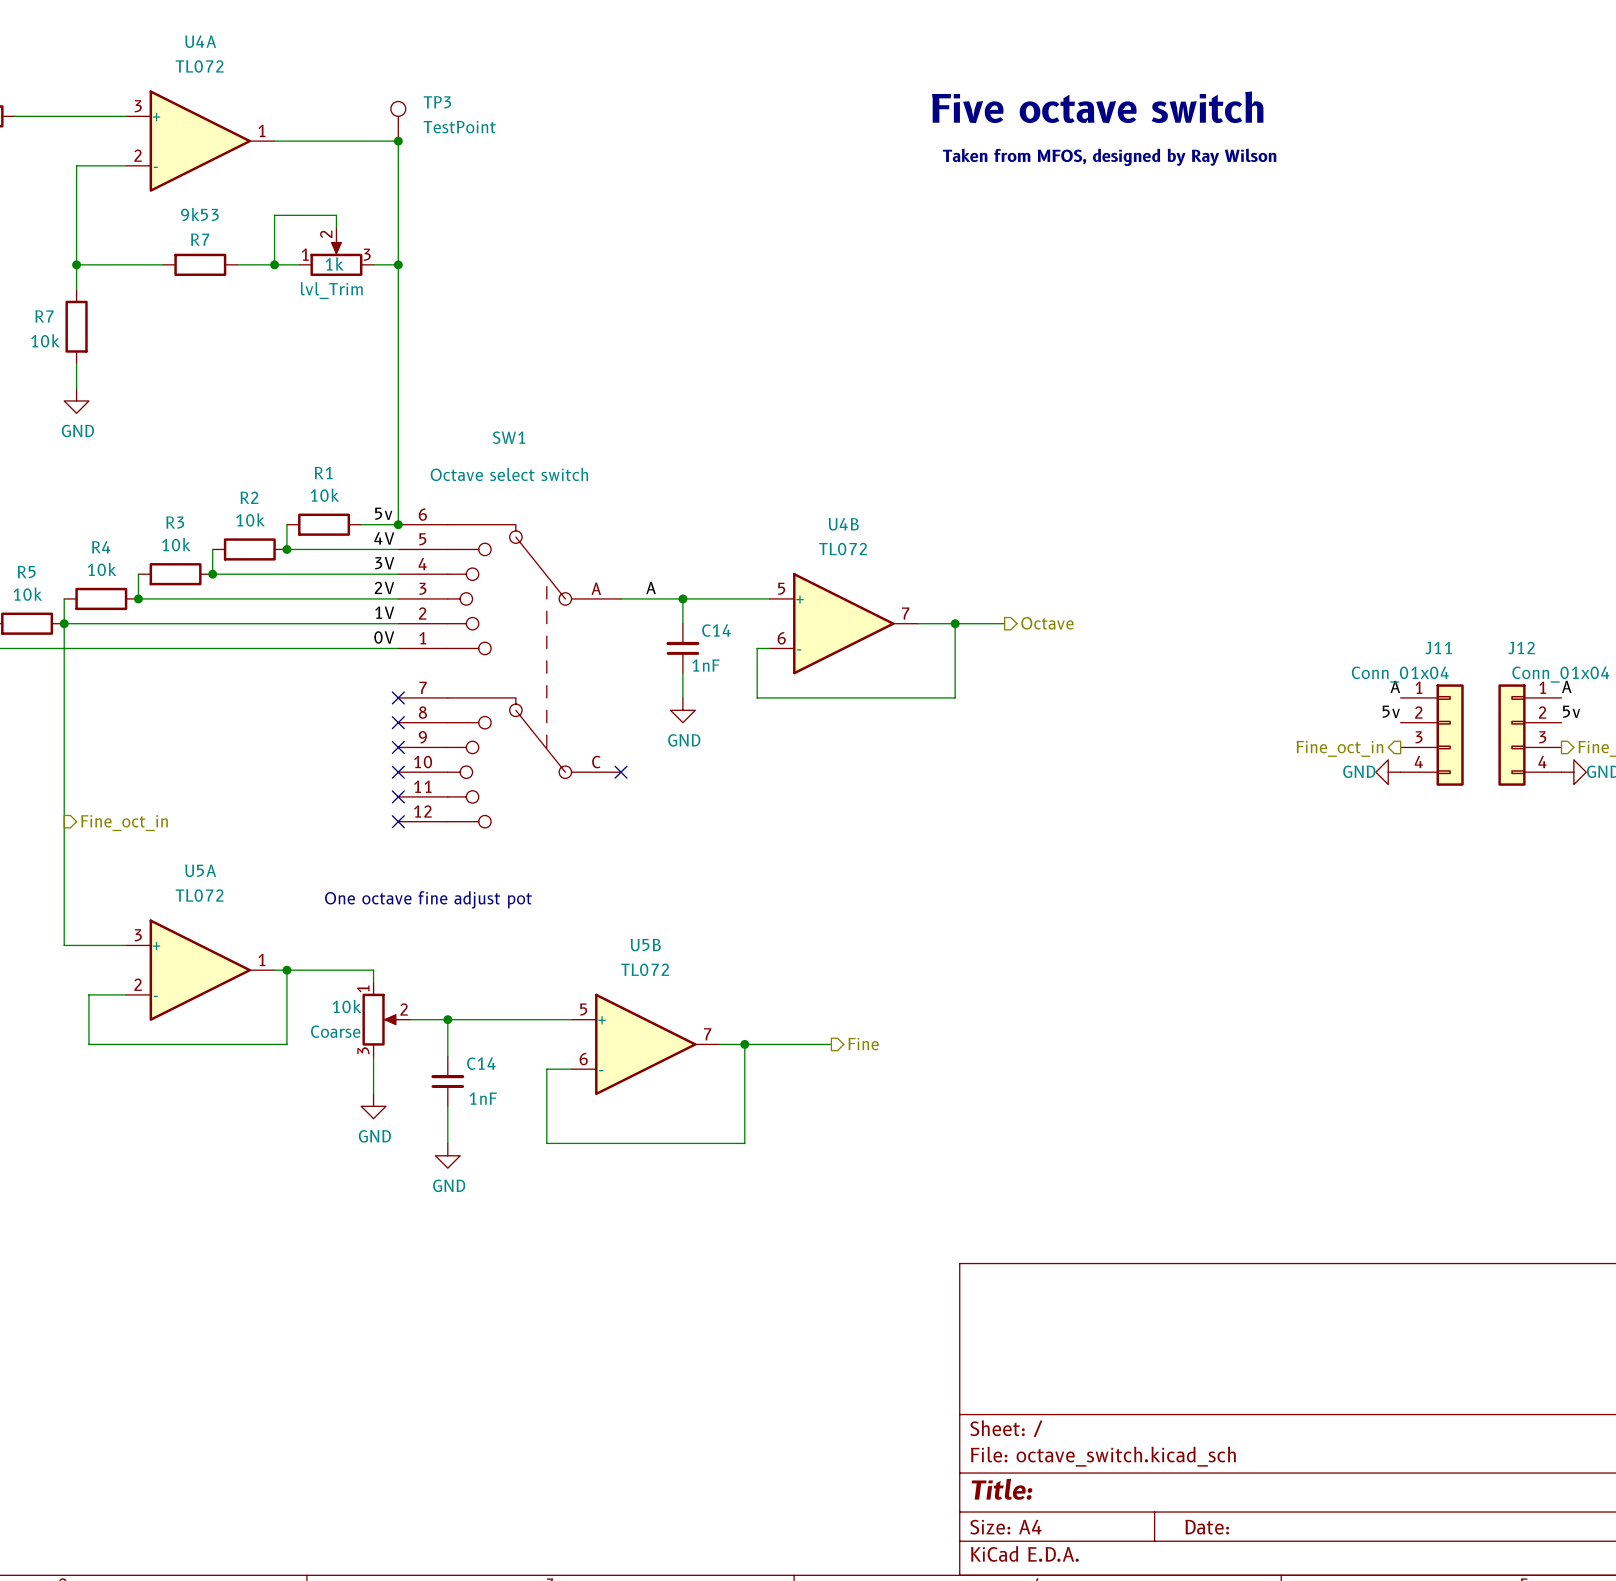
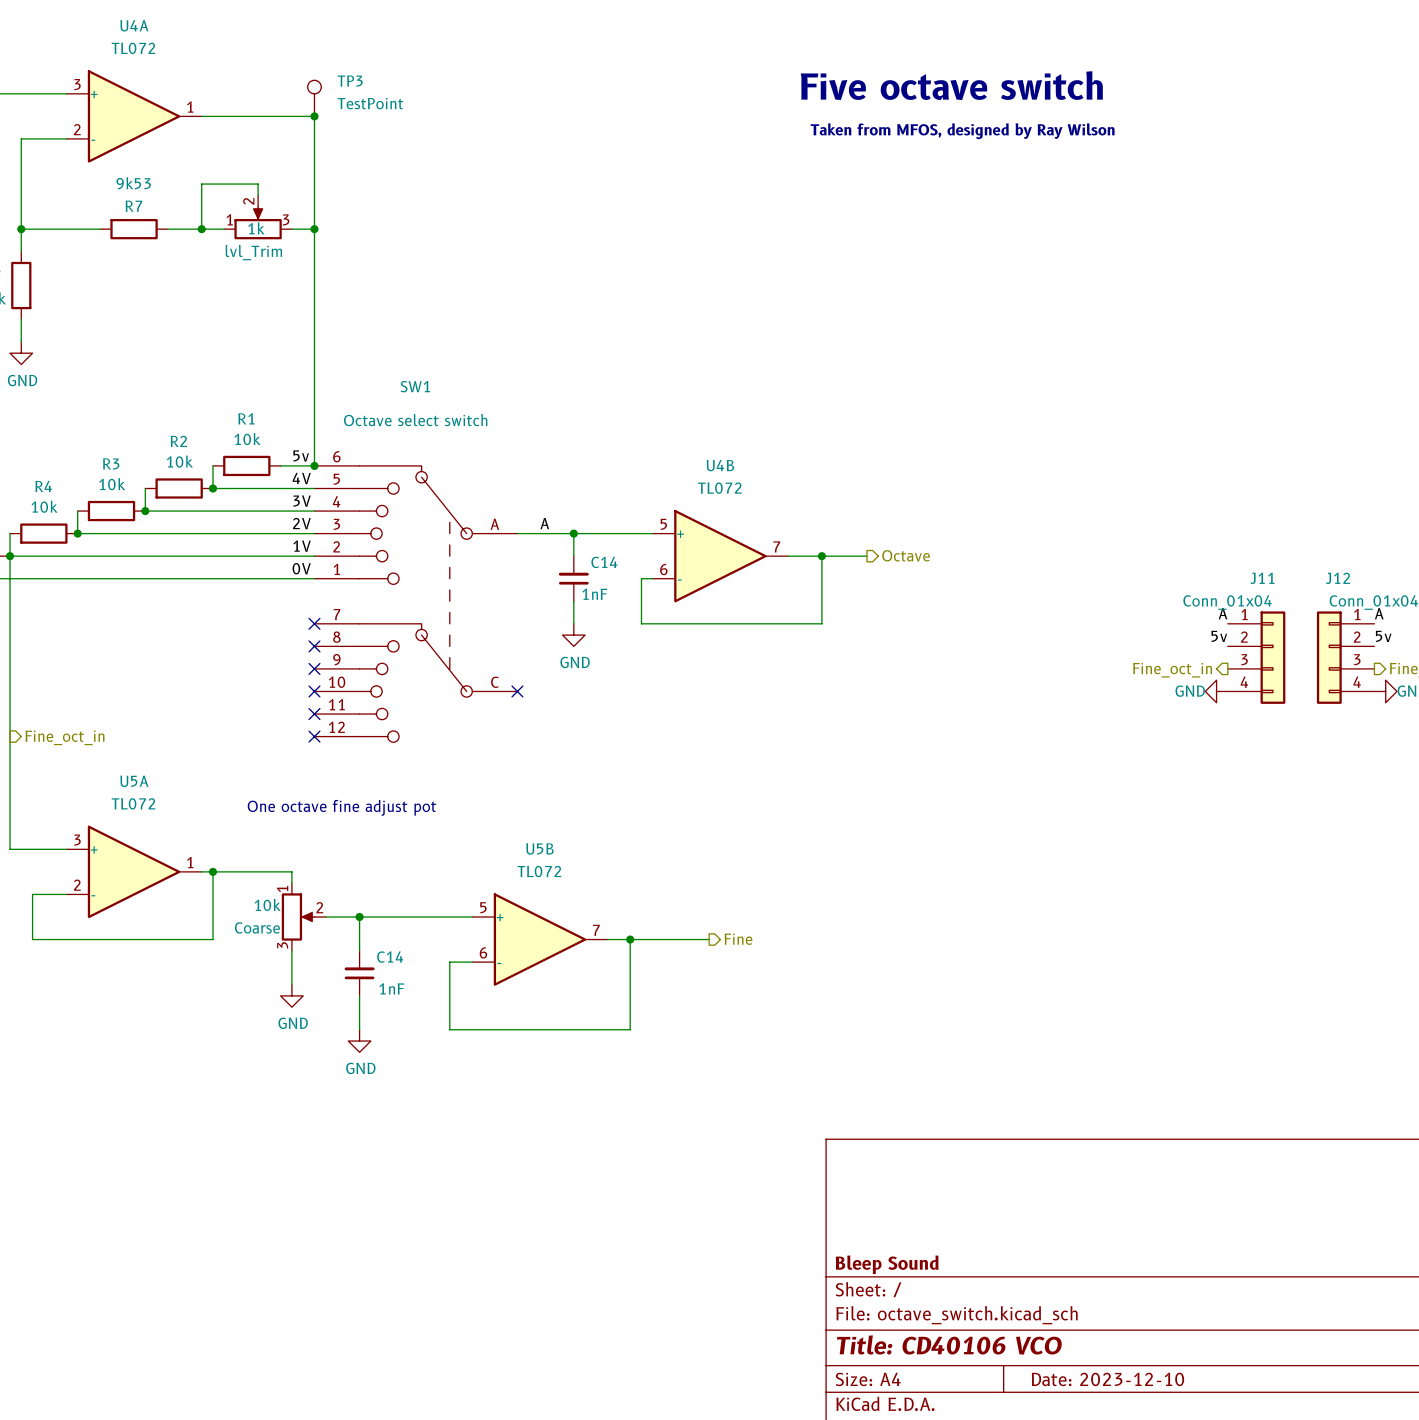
title block: none -> Bleep Sound (887, 1264)
title block: Title: (1002, 1489) -> Title: CD40106 VCO (949, 1344)
title block: Date: (1207, 1527) -> Date: 2023-12-10 (1107, 1379)

